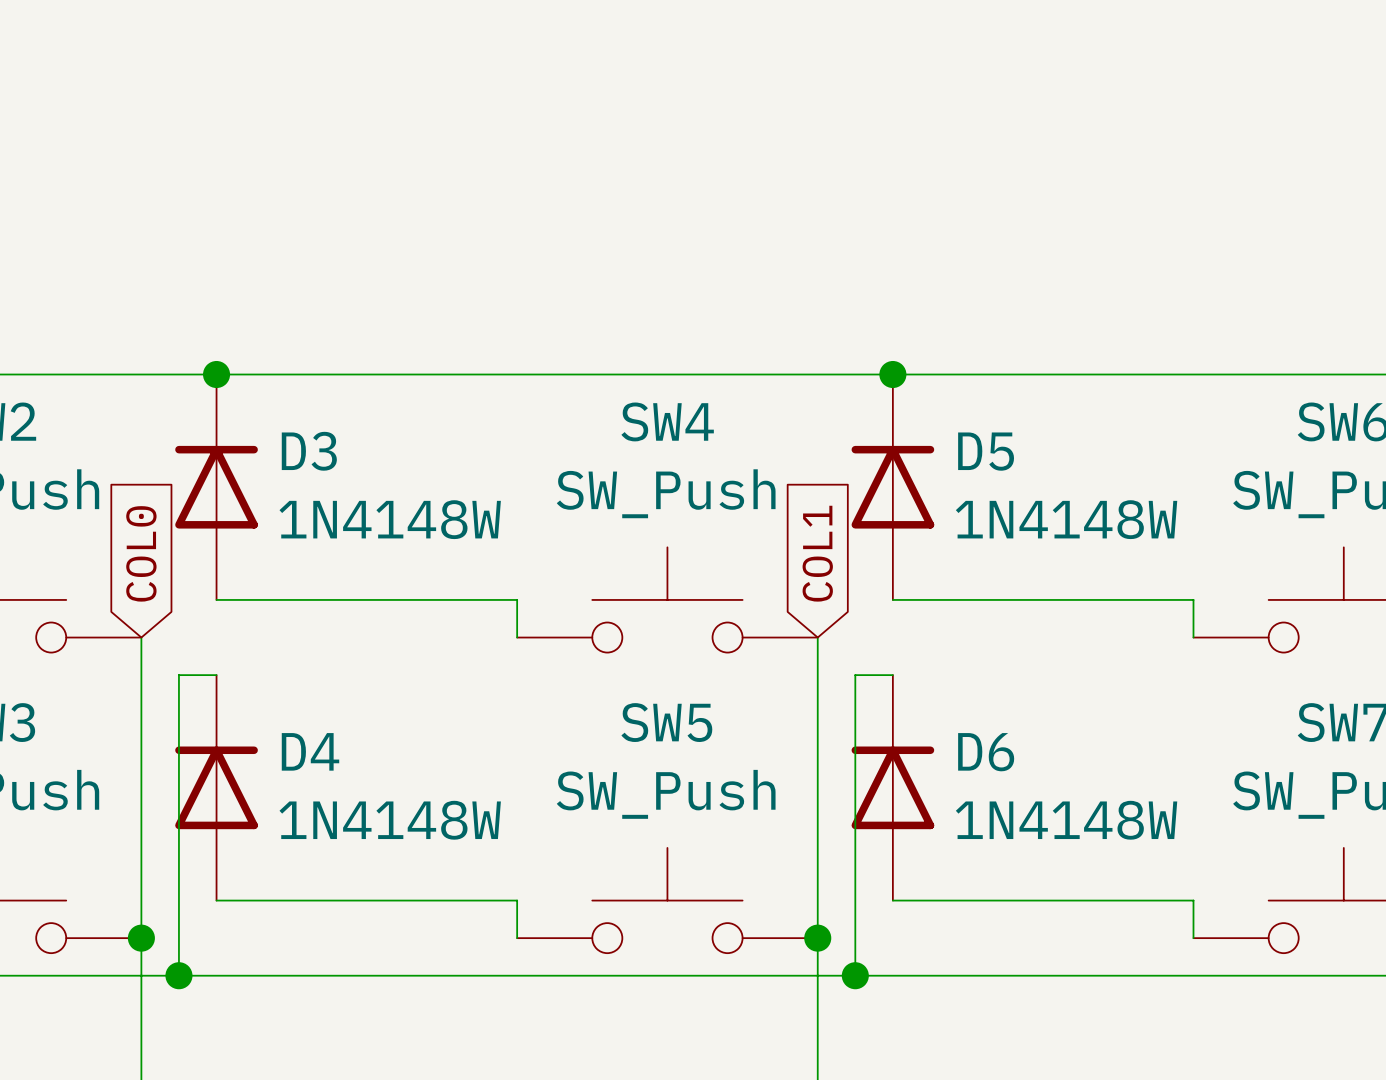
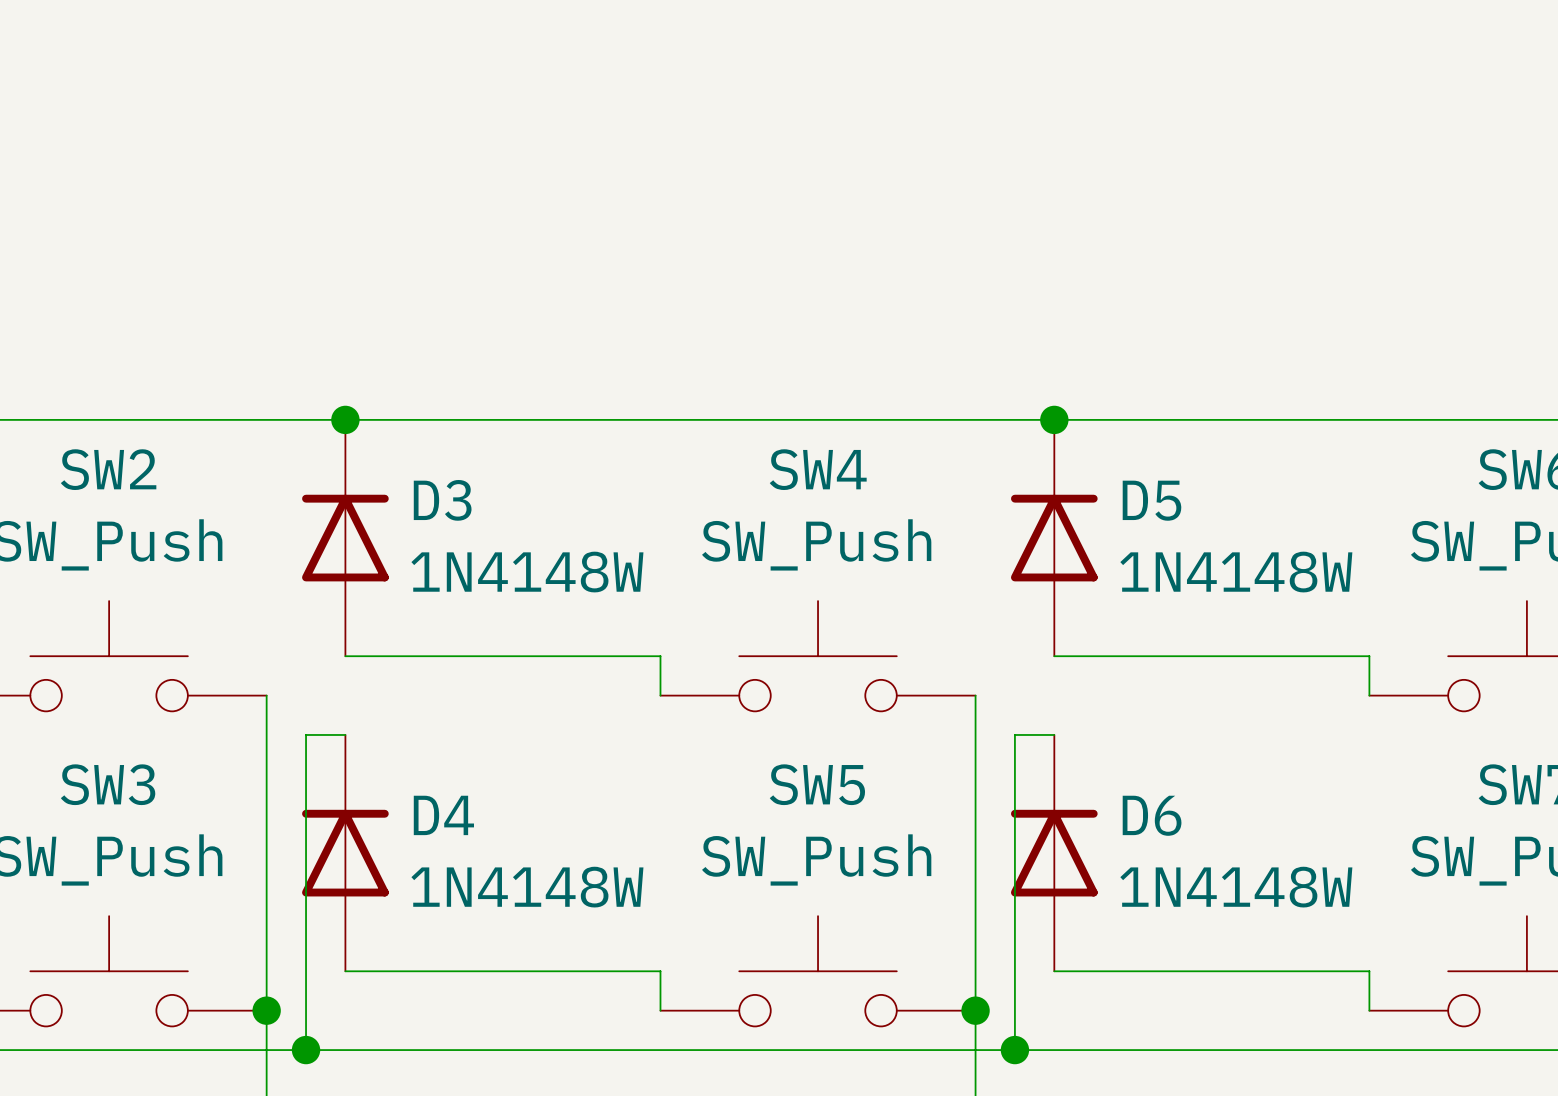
global label: COL0 (141, 553) -> none
global label: COL1 (817, 553) -> none

